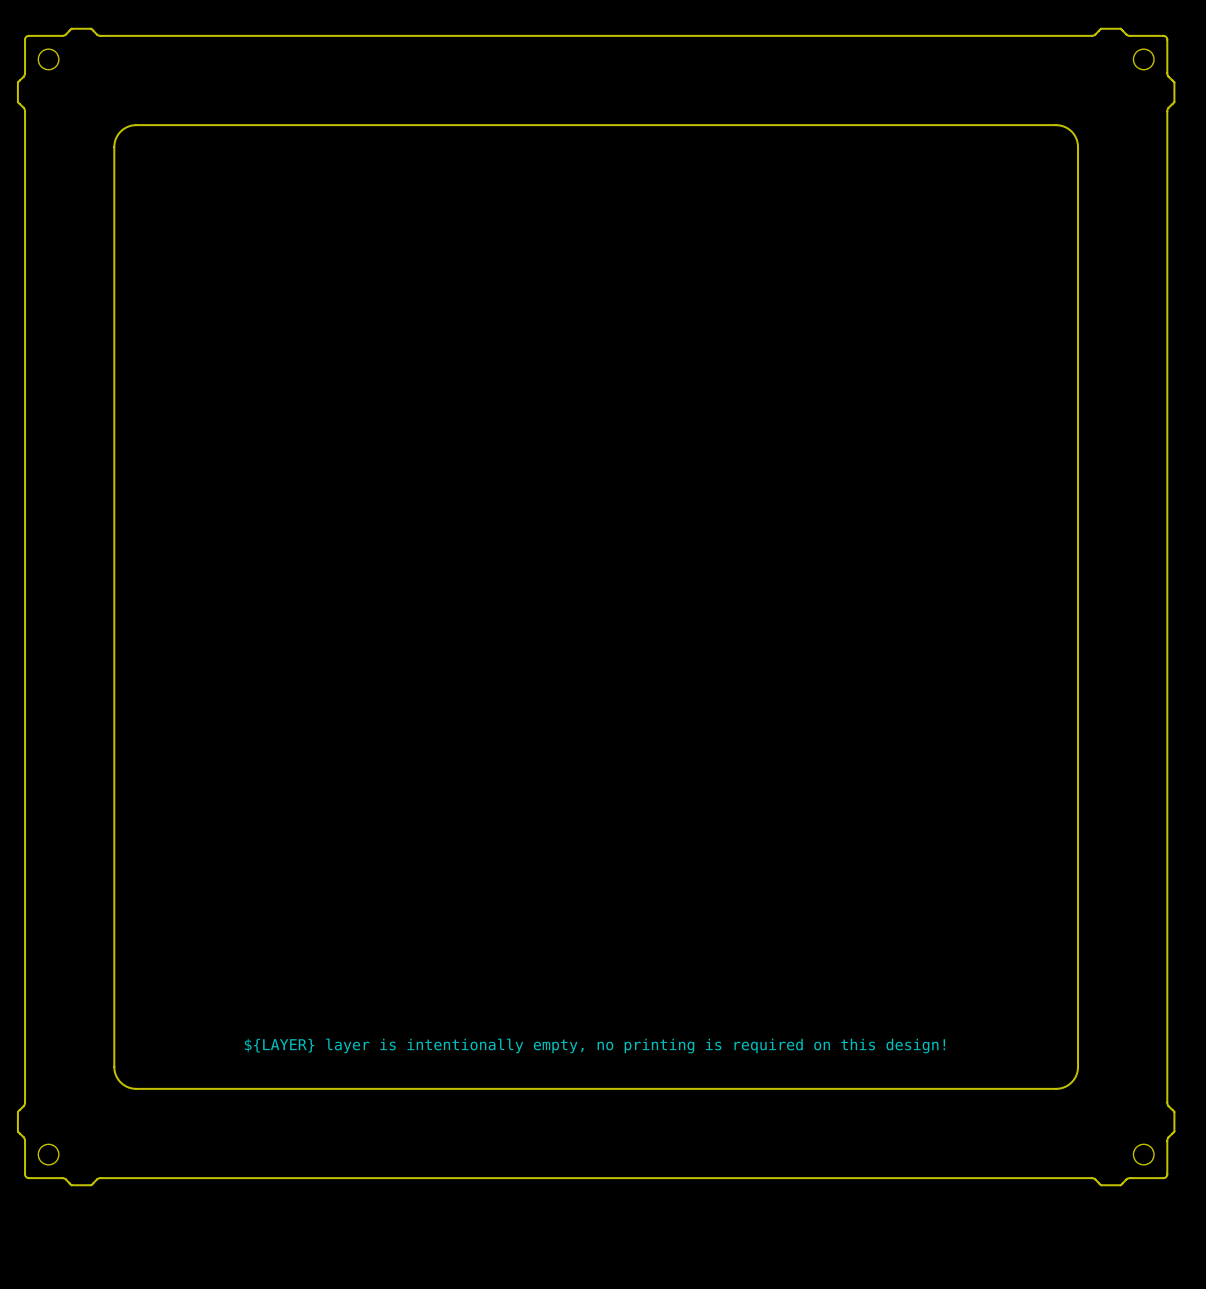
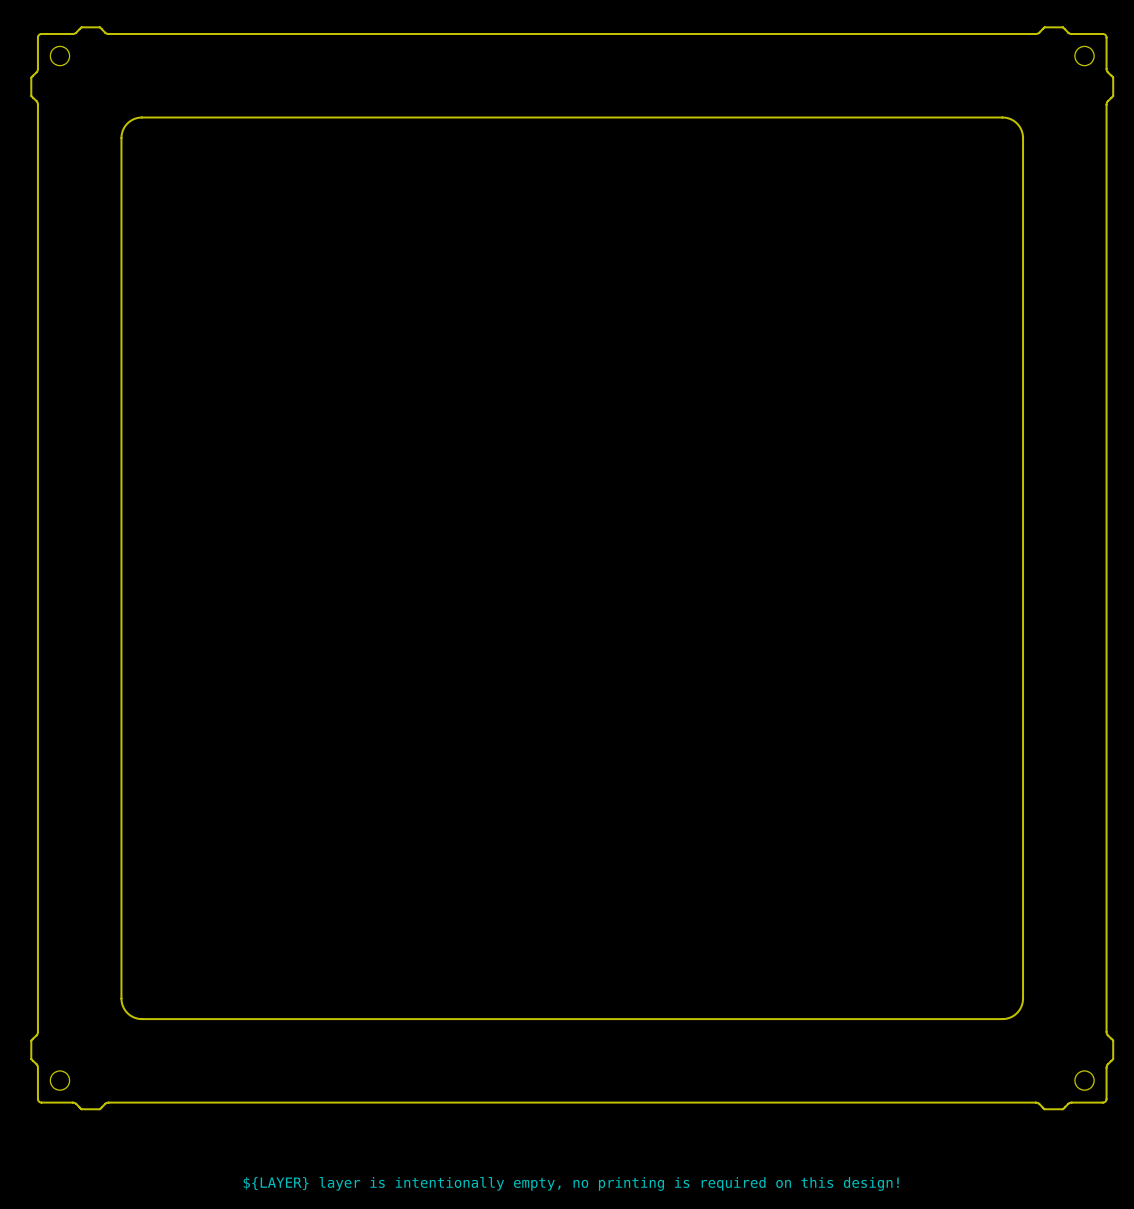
text position: ${LAYER} layer is intentionally empty, no printing is required on this design! (594, 1046) -> ${LAYER} layer is intentionally empty, no printing is required on this design! (571, 1183)

